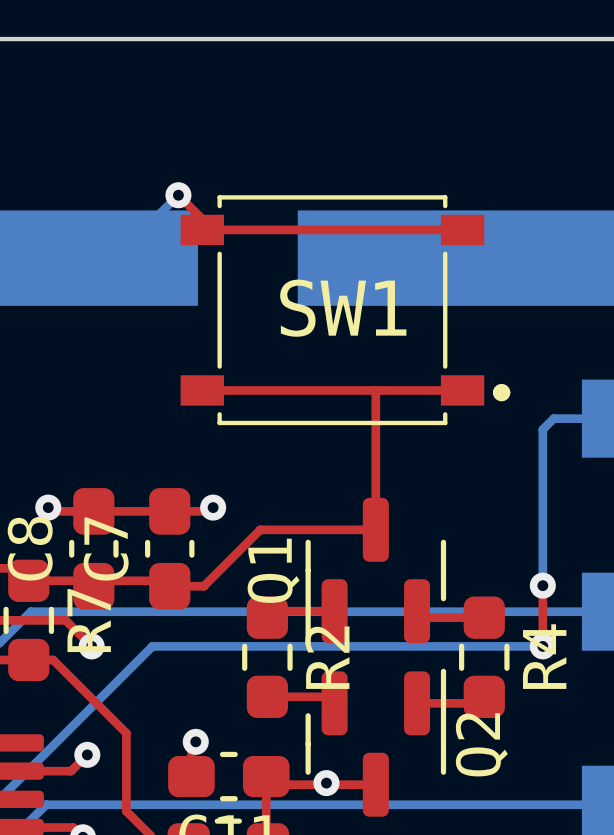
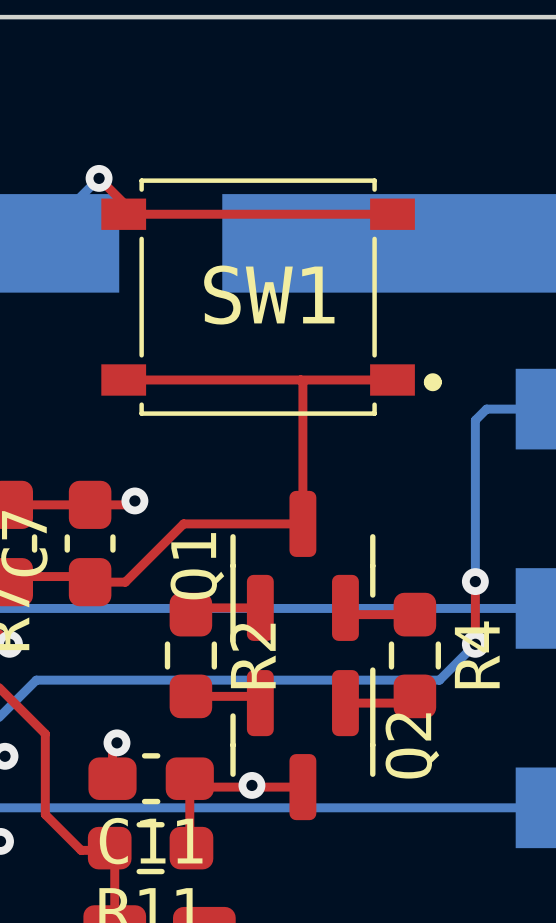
bottom track: (542, 646) (152, 646) (117, 681) -> (475, 644) (439, 680) (36, 680)

